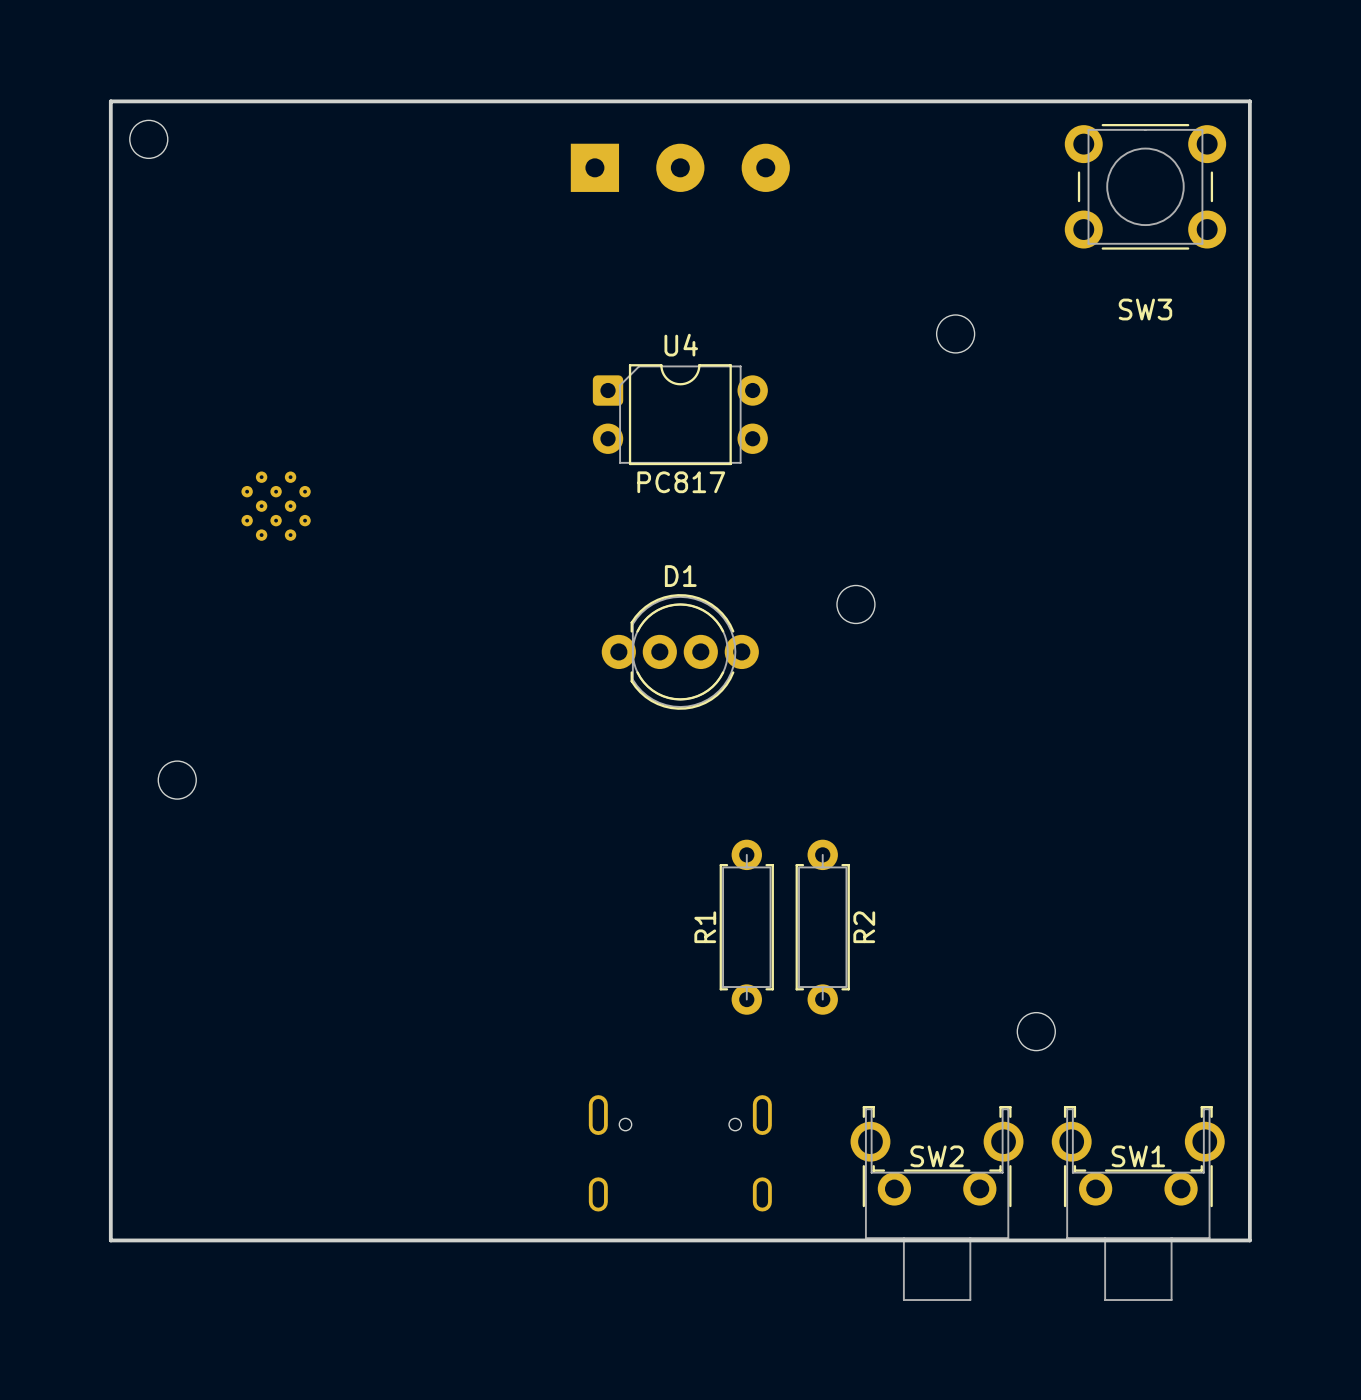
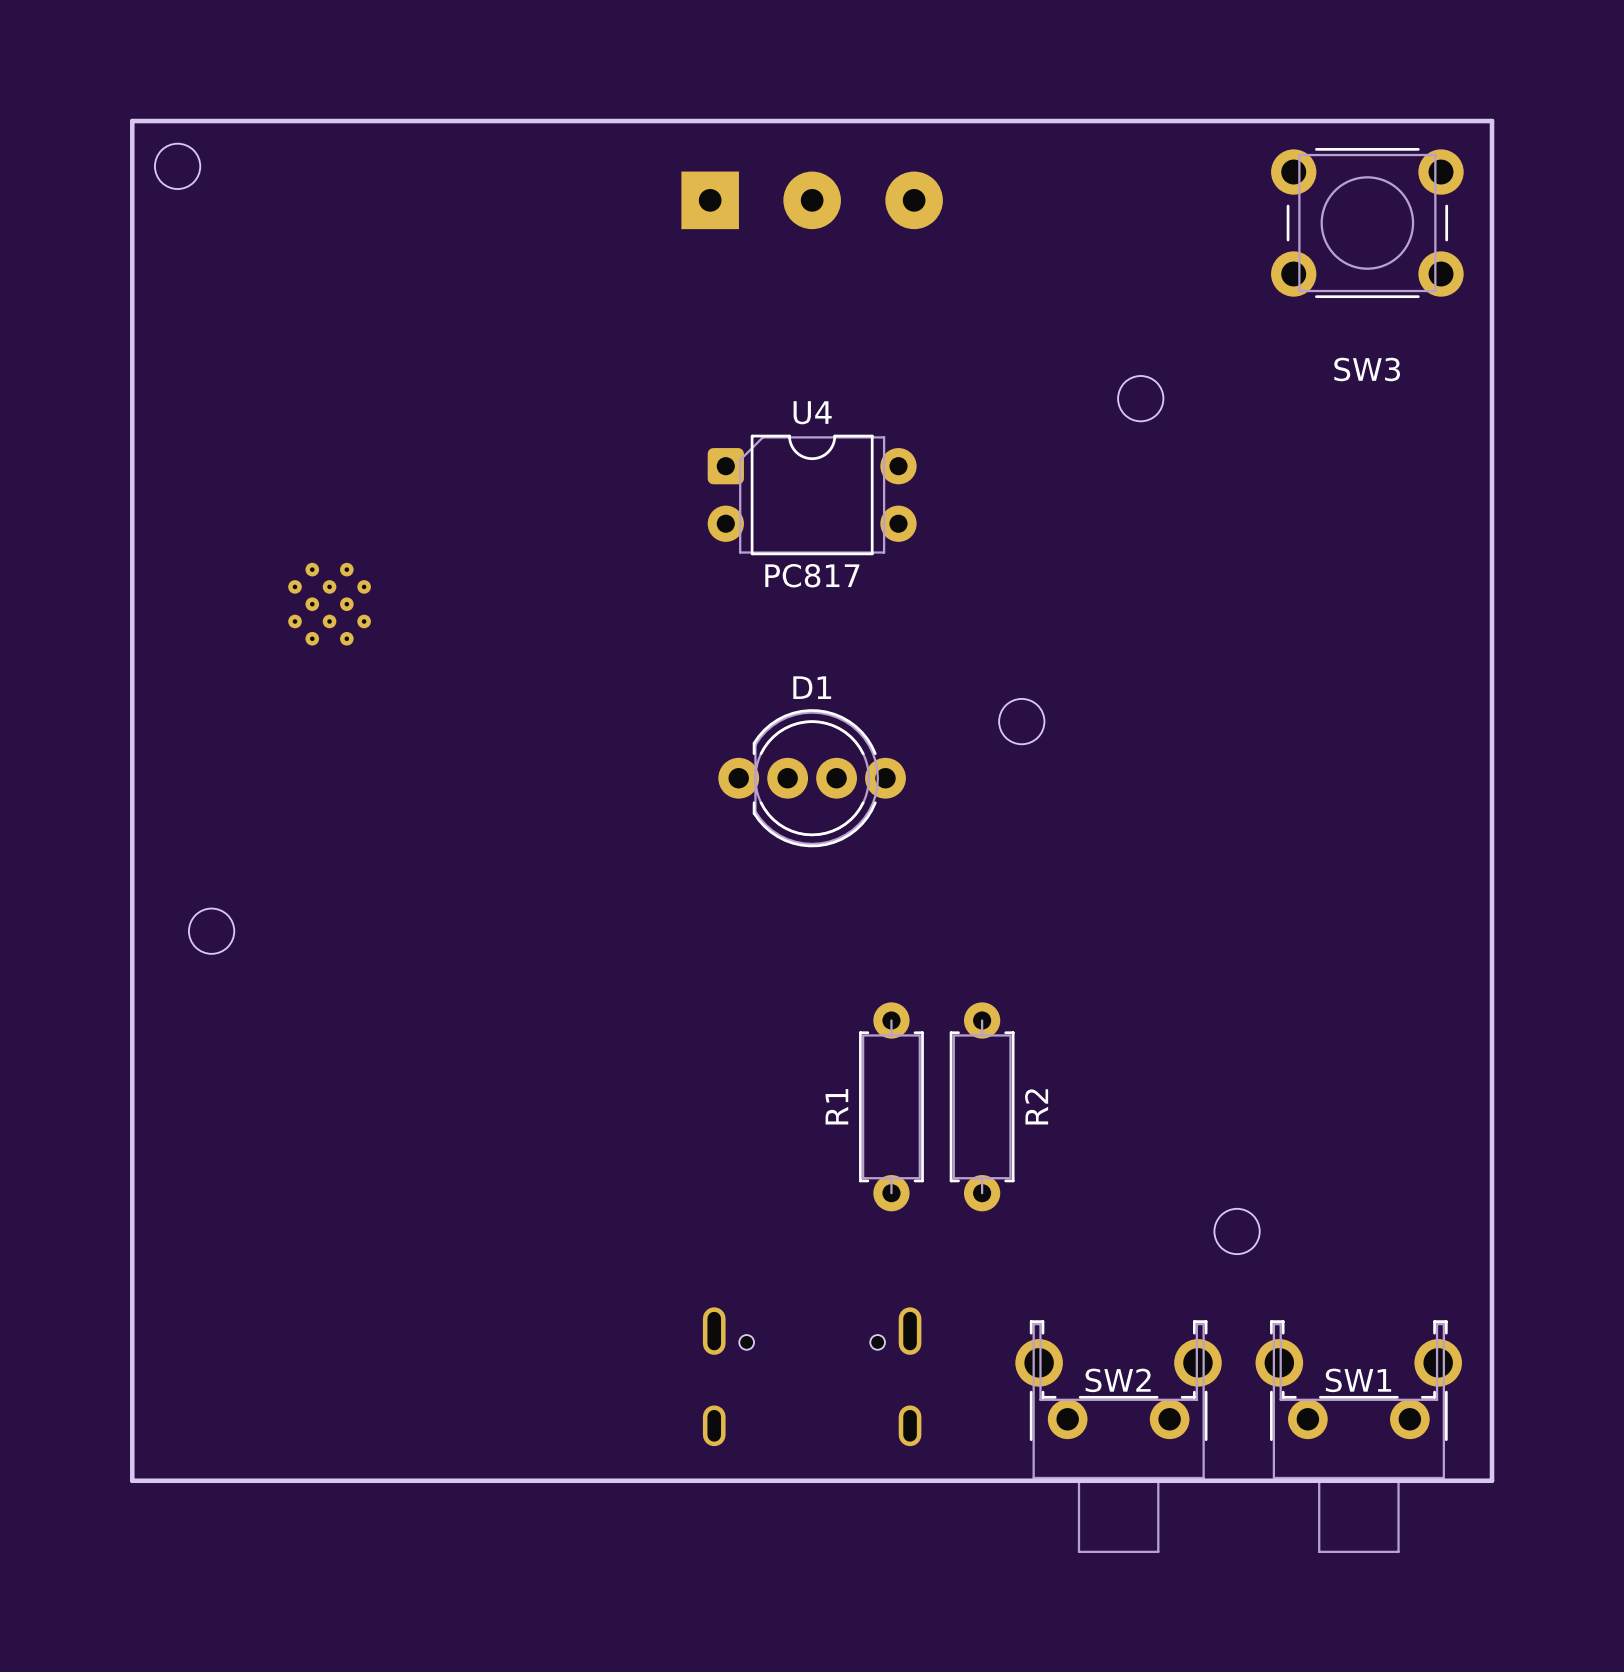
R1 name: R1 (705, 927) -> R2 (1036, 1106)
R2 name: R2 (864, 927) -> R1 (836, 1106)

